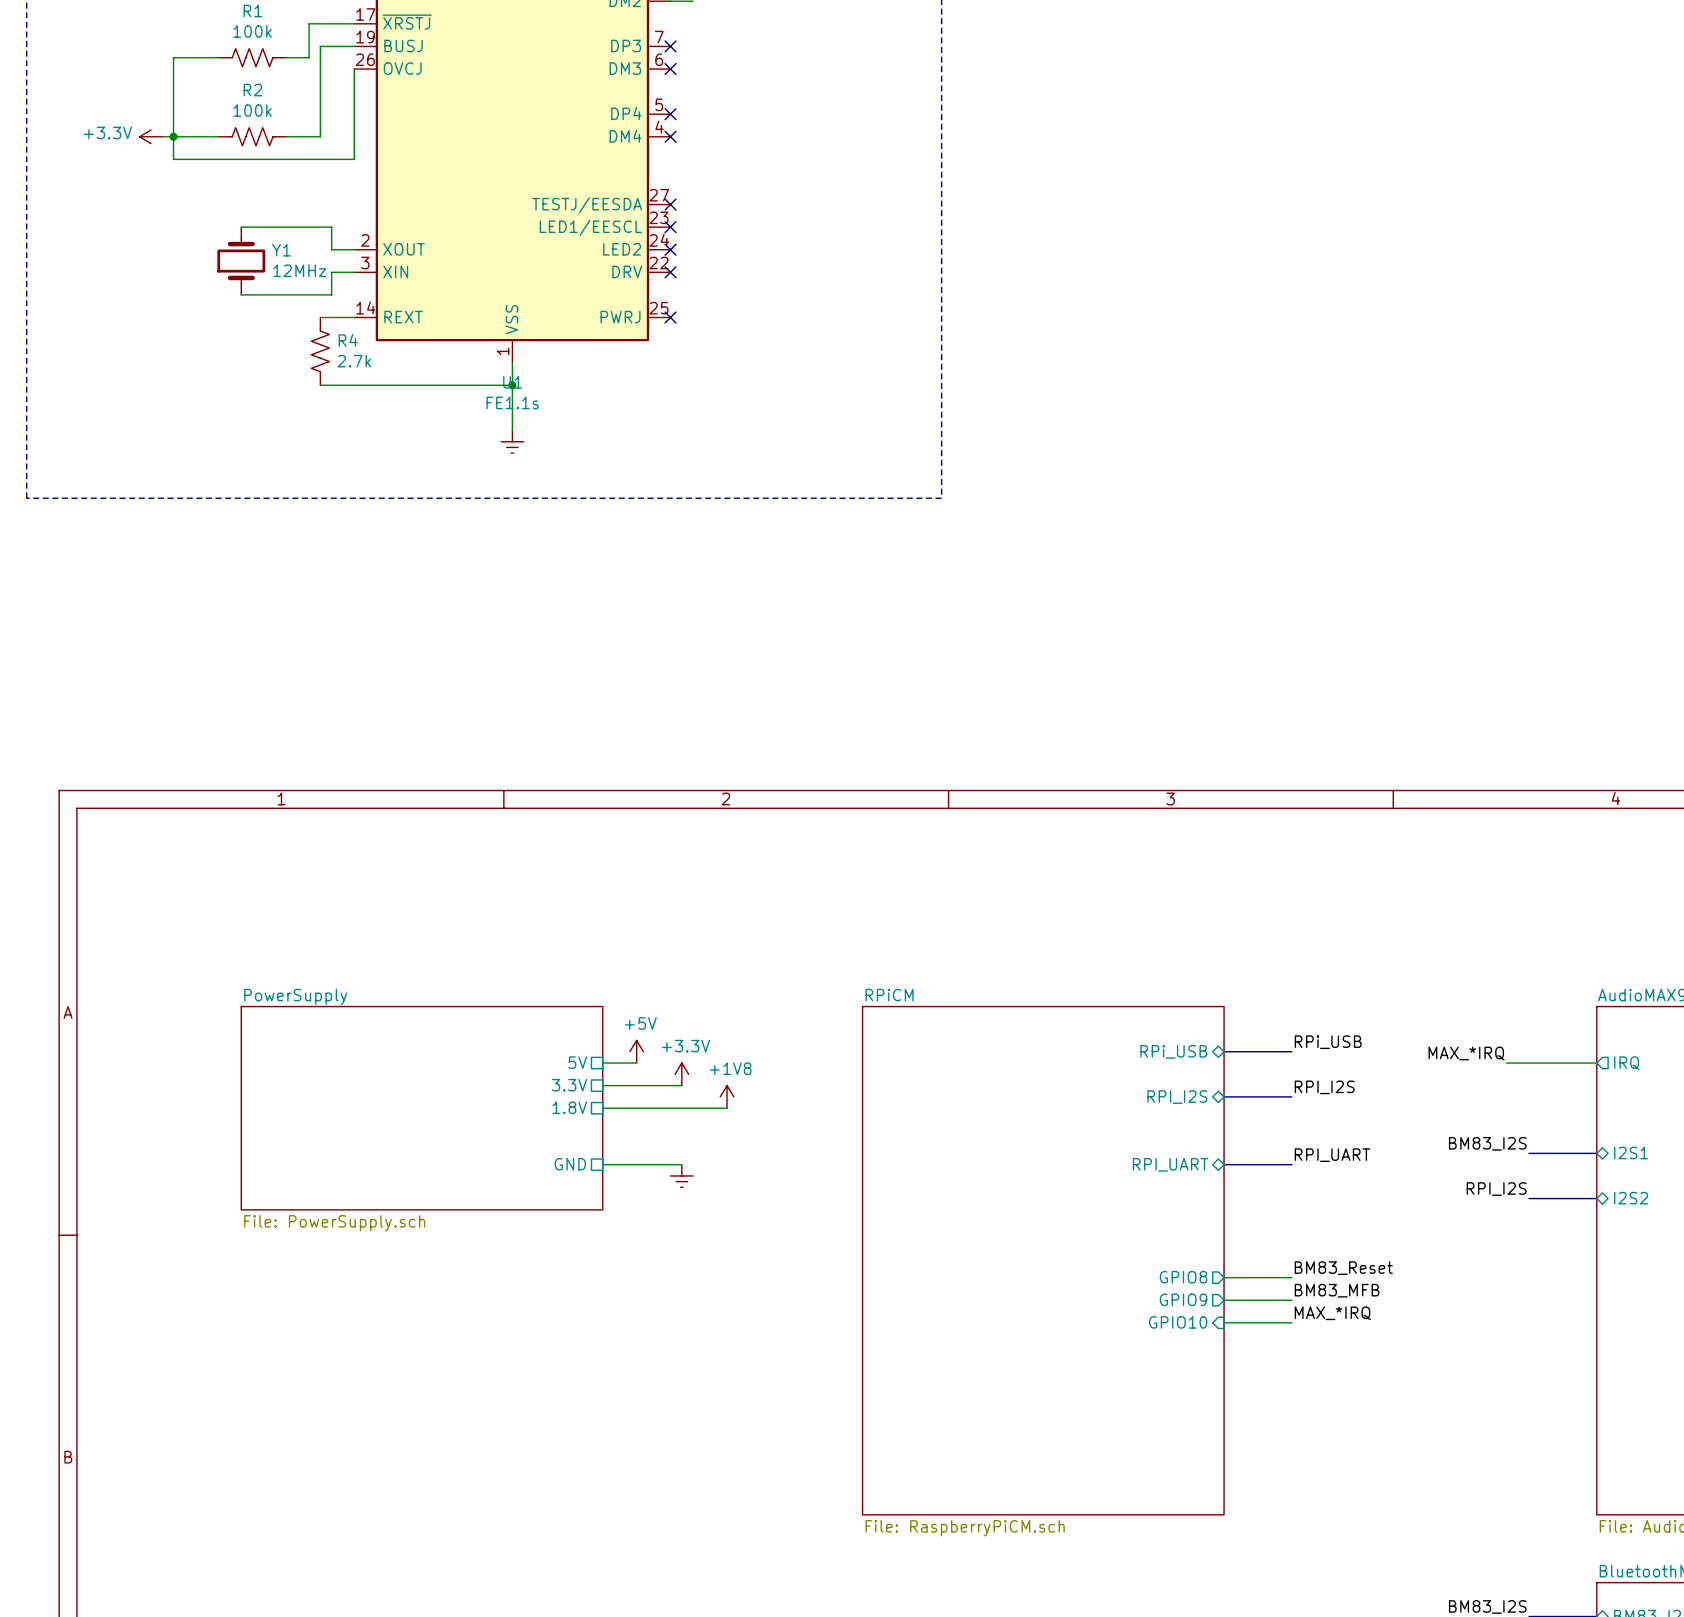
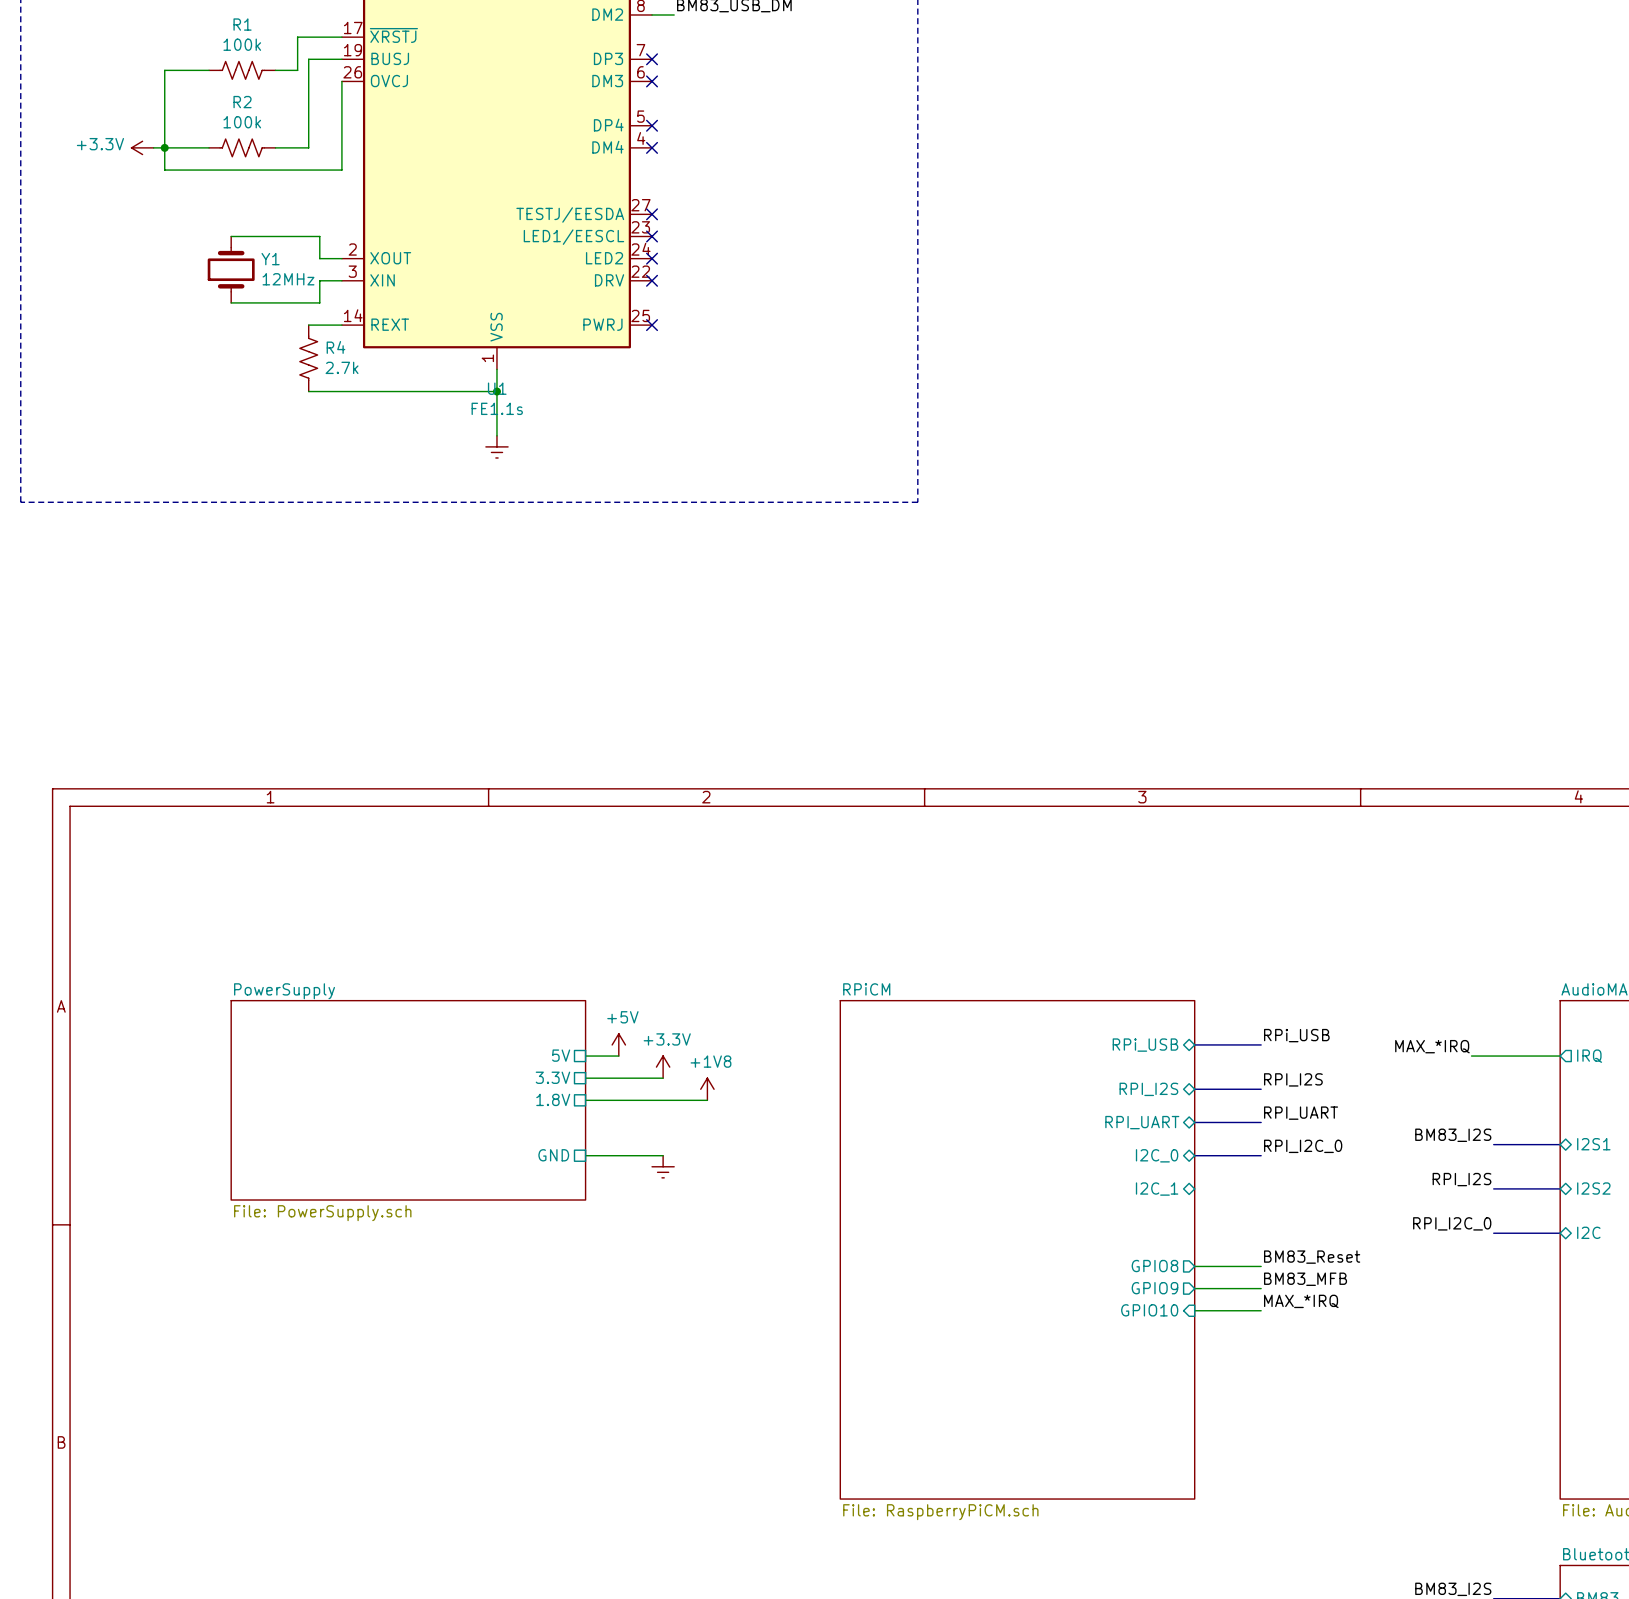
label: none -> RPI_UART (1301, 1113)
sheet pin: none -> RPI_UART (1142, 1122)
bus: none -> (1194, 1122) (1261, 1122)
label: RPI_UART (1332, 1155) -> RPI_I2C_0 (1303, 1146)
sheet pin: RPI_UART (1170, 1164) -> I2C_0 (1157, 1155)
sheet pin: none -> I2C_1 (1157, 1189)
label: none -> RPI_I2C_0 (1452, 1223)
bus: none -> (1493, 1233) (1560, 1233)
sheet pin: none -> I2C (1588, 1232)

